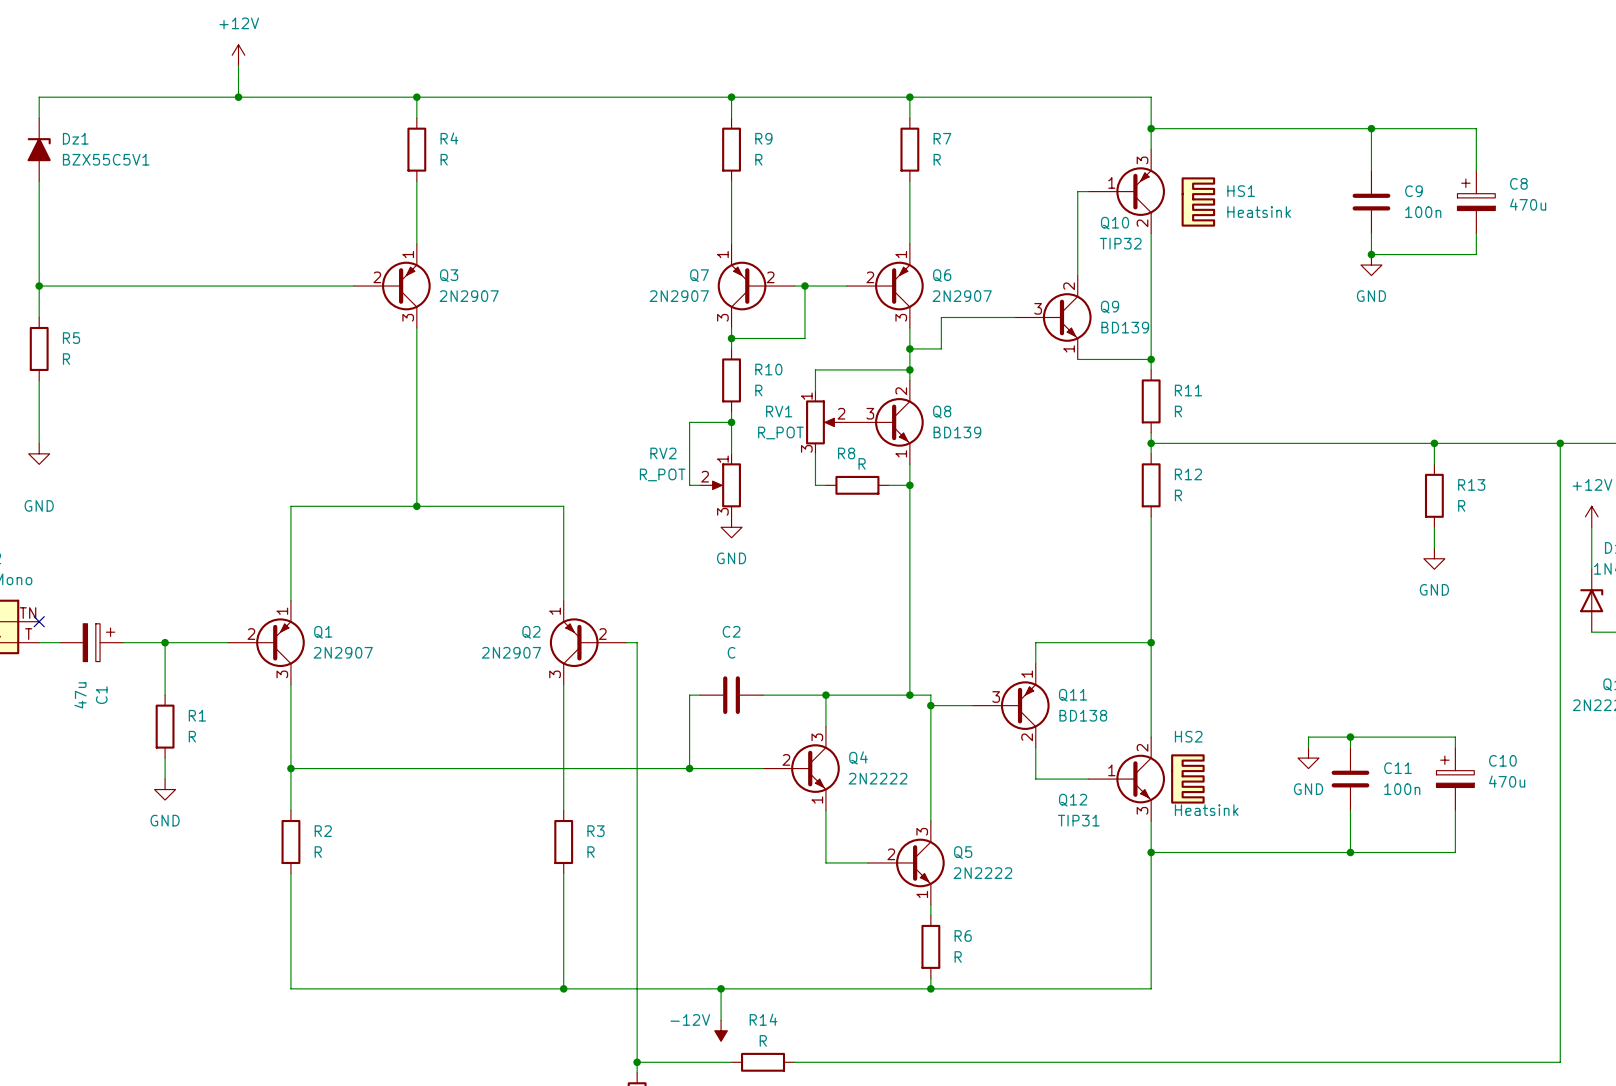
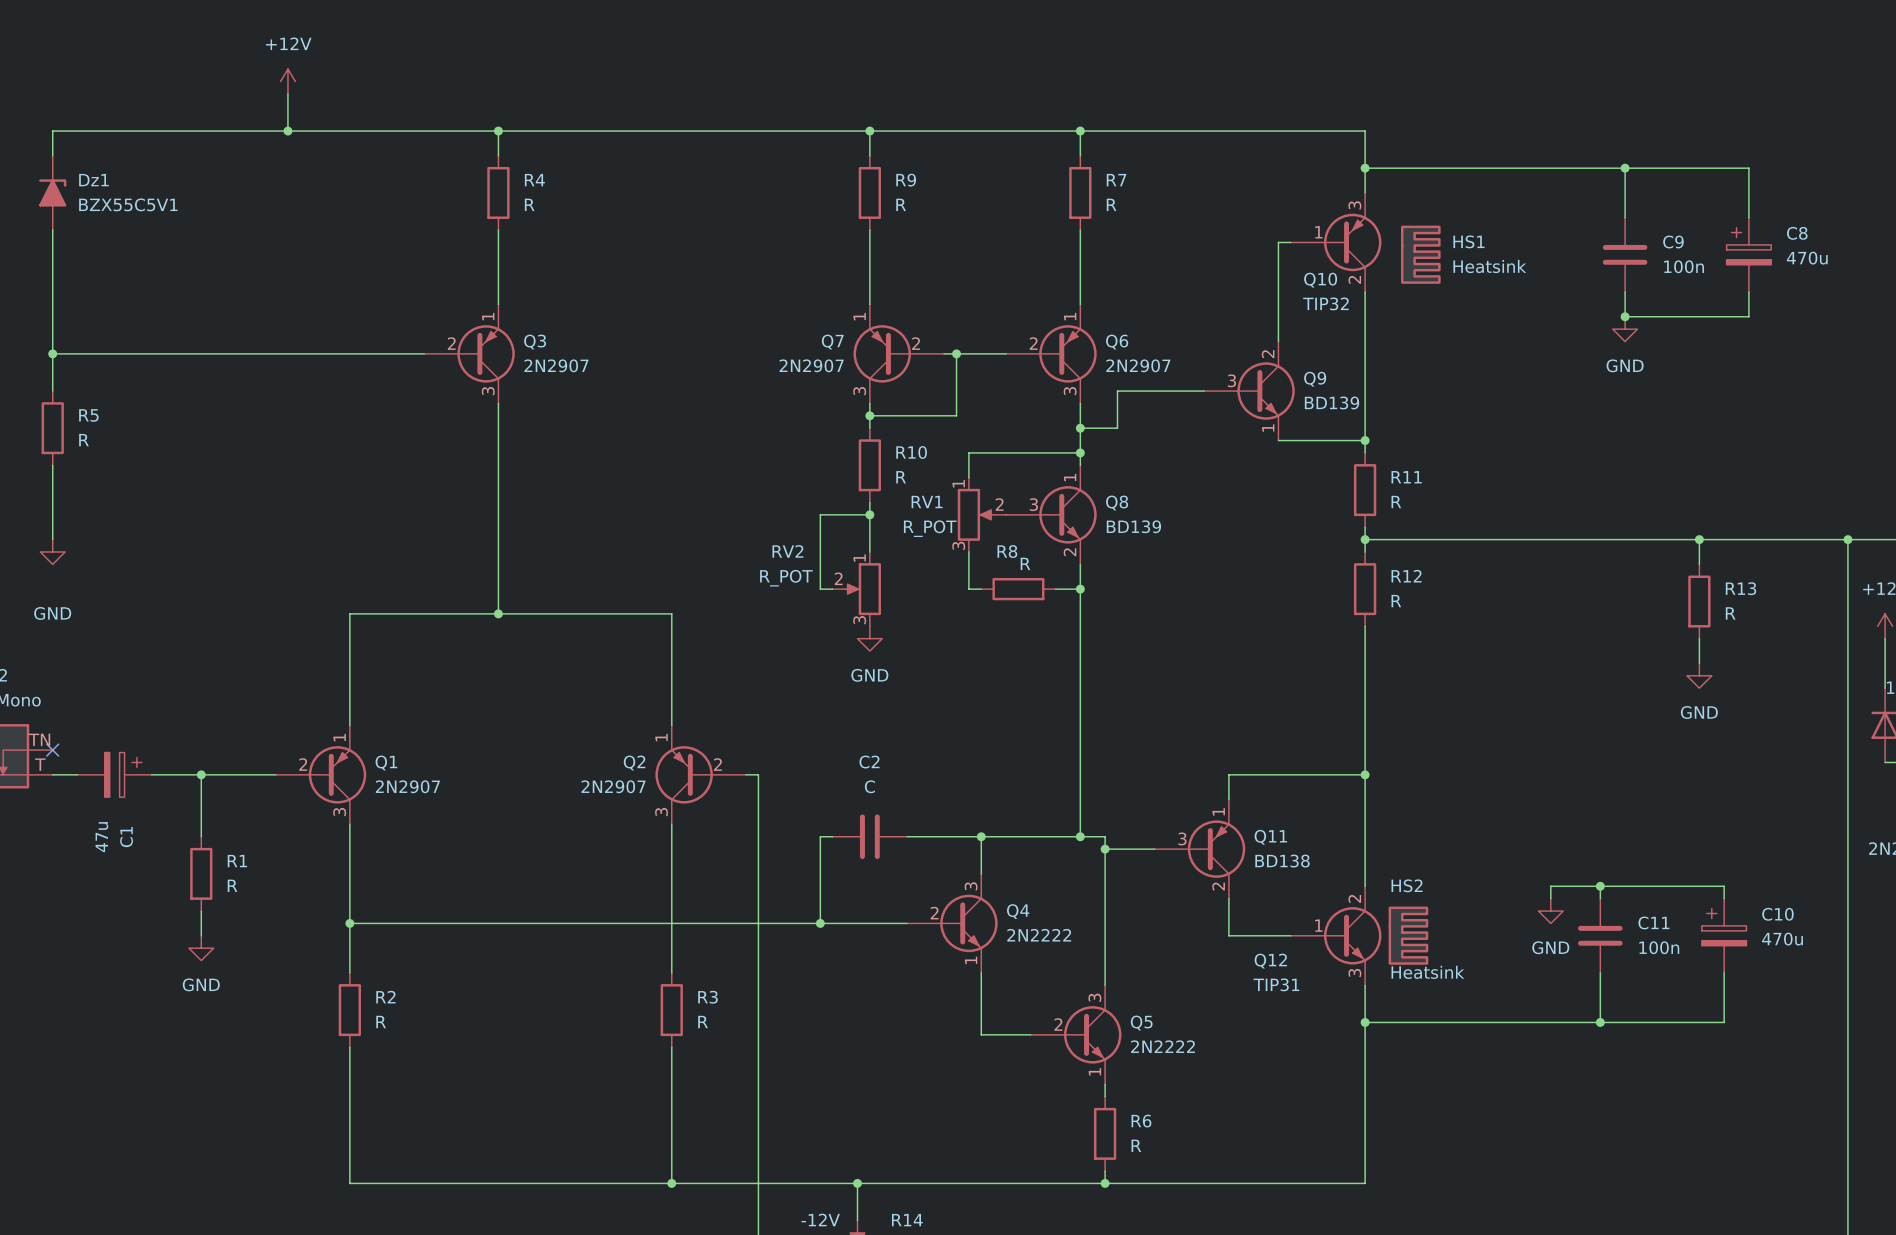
Q8 pin number: 2 (901, 391) -> 1 (1070, 477)
Q8 pin number: 1 (901, 453) -> 2 (1070, 552)

